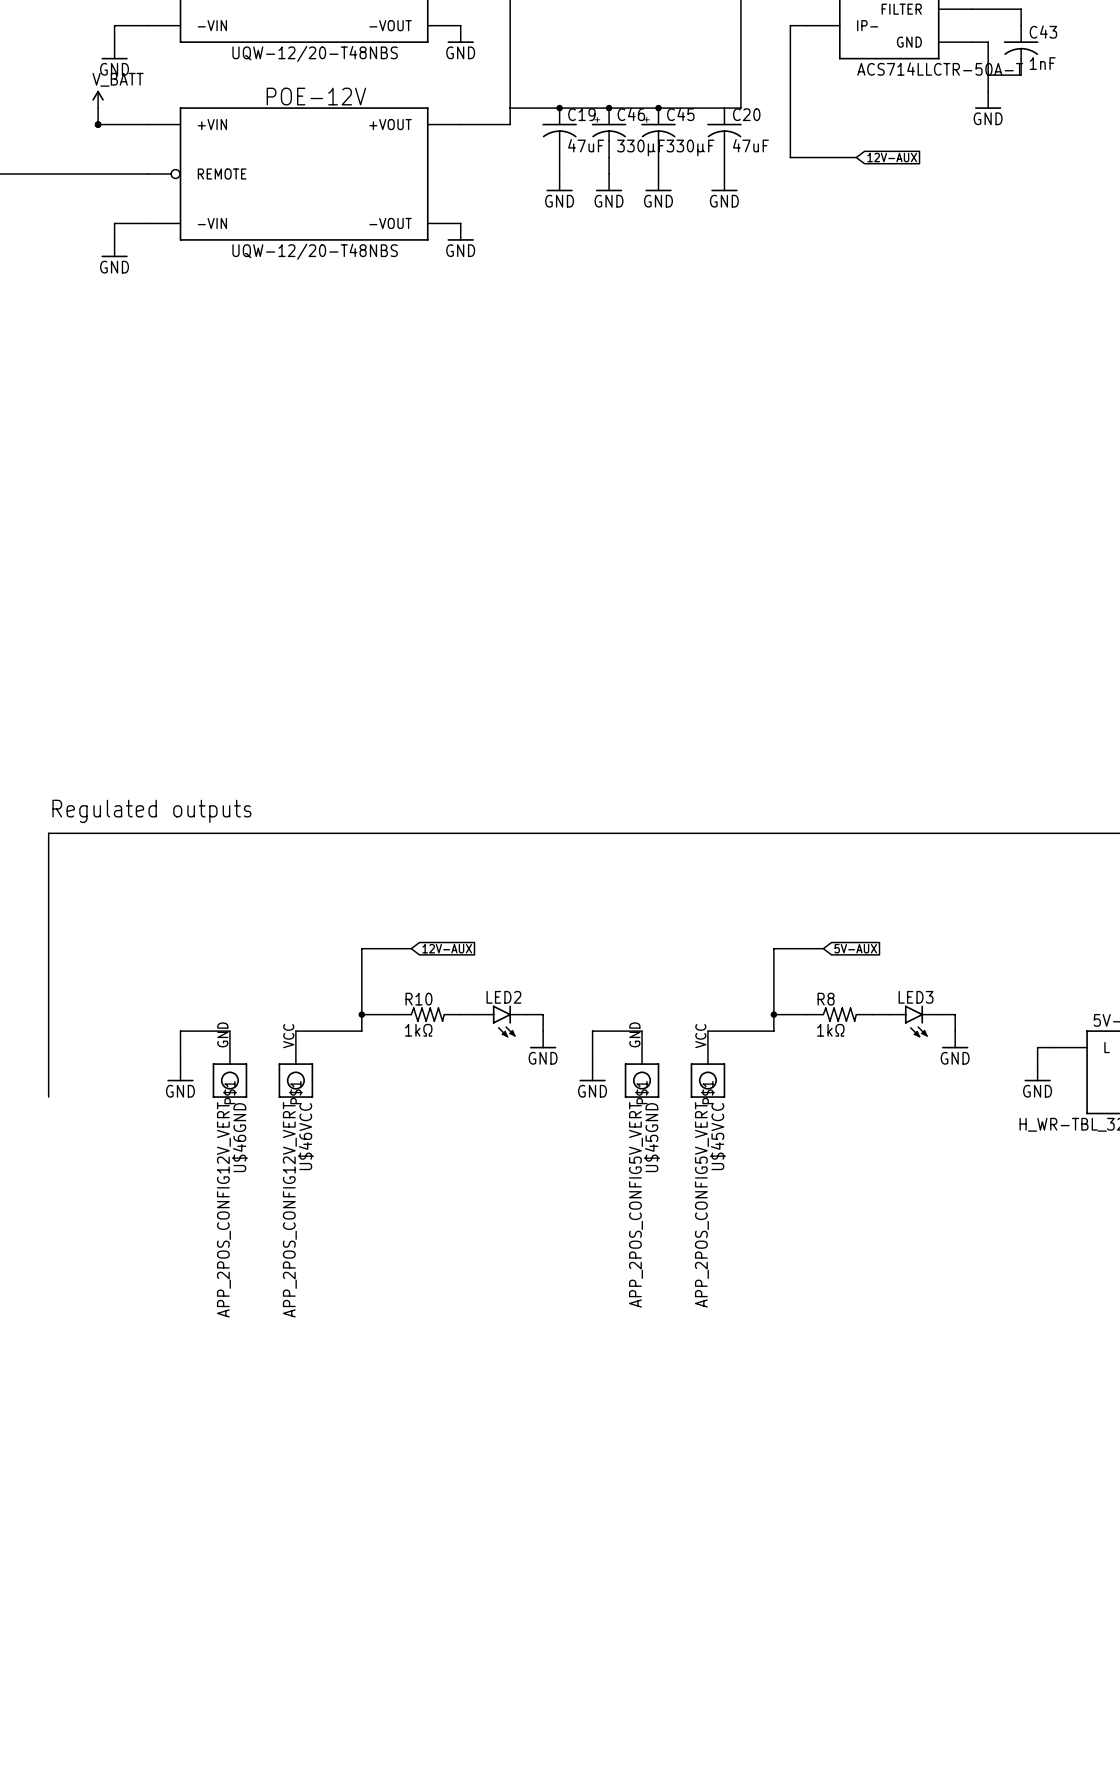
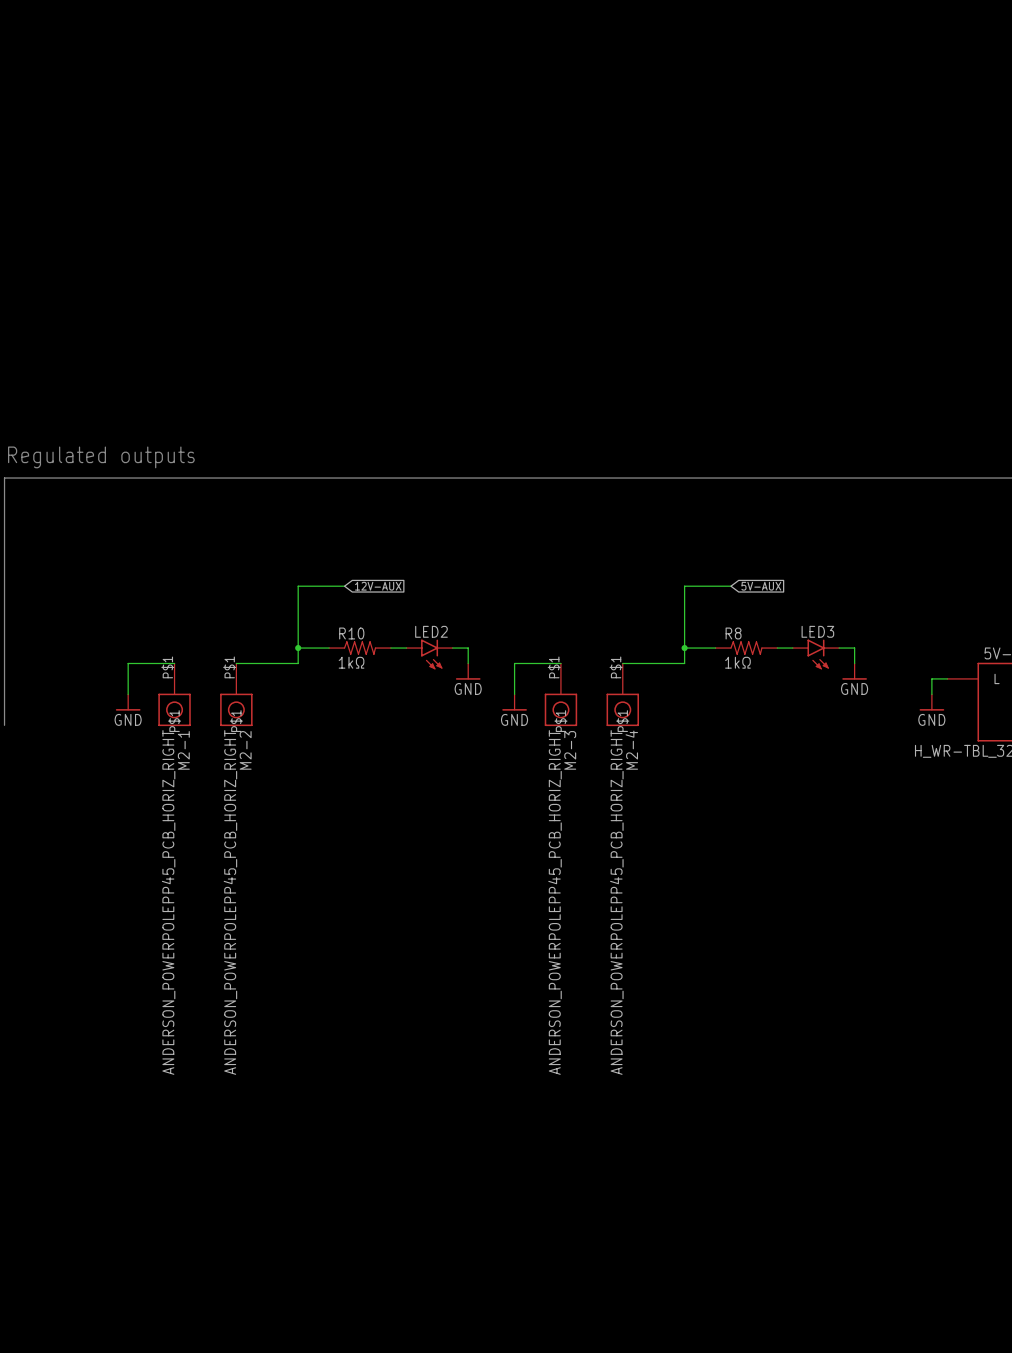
U$46GND pin number: GND (222, 1034) -> P$1 (167, 667)
U$45GND pin number: GND (634, 1034) -> P$1 (554, 667)
U$46VCC pin number: VCC (288, 1036) -> P$1 (229, 667)
U$45VCC pin number: VCC (700, 1036) -> P$1 (616, 667)
U$46VCC name: U$46VCC (305, 1136) -> M2-2 (245, 750)
U$45VCC name: U$45VCC (717, 1136) -> M2-4 (631, 750)
U$46GND name: U$46GND (239, 1137) -> M2-1 (183, 750)
U$45GND name: U$45GND (651, 1137) -> M2-3 (570, 750)
U$45GND value: APP_2POS_CONFIG5V_VERT (635, 1204) -> ANDERSON_POWERPOLEPP45_PCB_HORIZ_RIGHT (555, 902)
U$45VCC value: APP_2POS_CONFIG5V_VERT (701, 1204) -> ANDERSON_POWERPOLEPP45_PCB_HORIZ_RIGHT (616, 902)
U$46GND value: APP_2POS_CONFIG12V_VERT (223, 1209) -> ANDERSON_POWERPOLEPP45_PCB_HORIZ_RIGHT (168, 902)
U$46VCC value: APP_2POS_CONFIG12V_VERT (289, 1209) -> ANDERSON_POWERPOLEPP45_PCB_HORIZ_RIGHT (230, 902)

